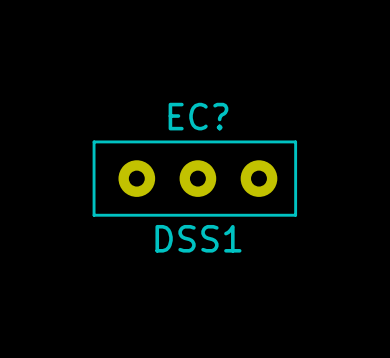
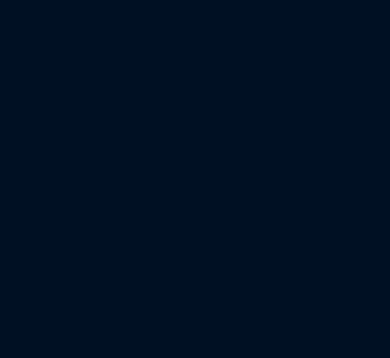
EC?: DSS1 (194, 178) -> none

